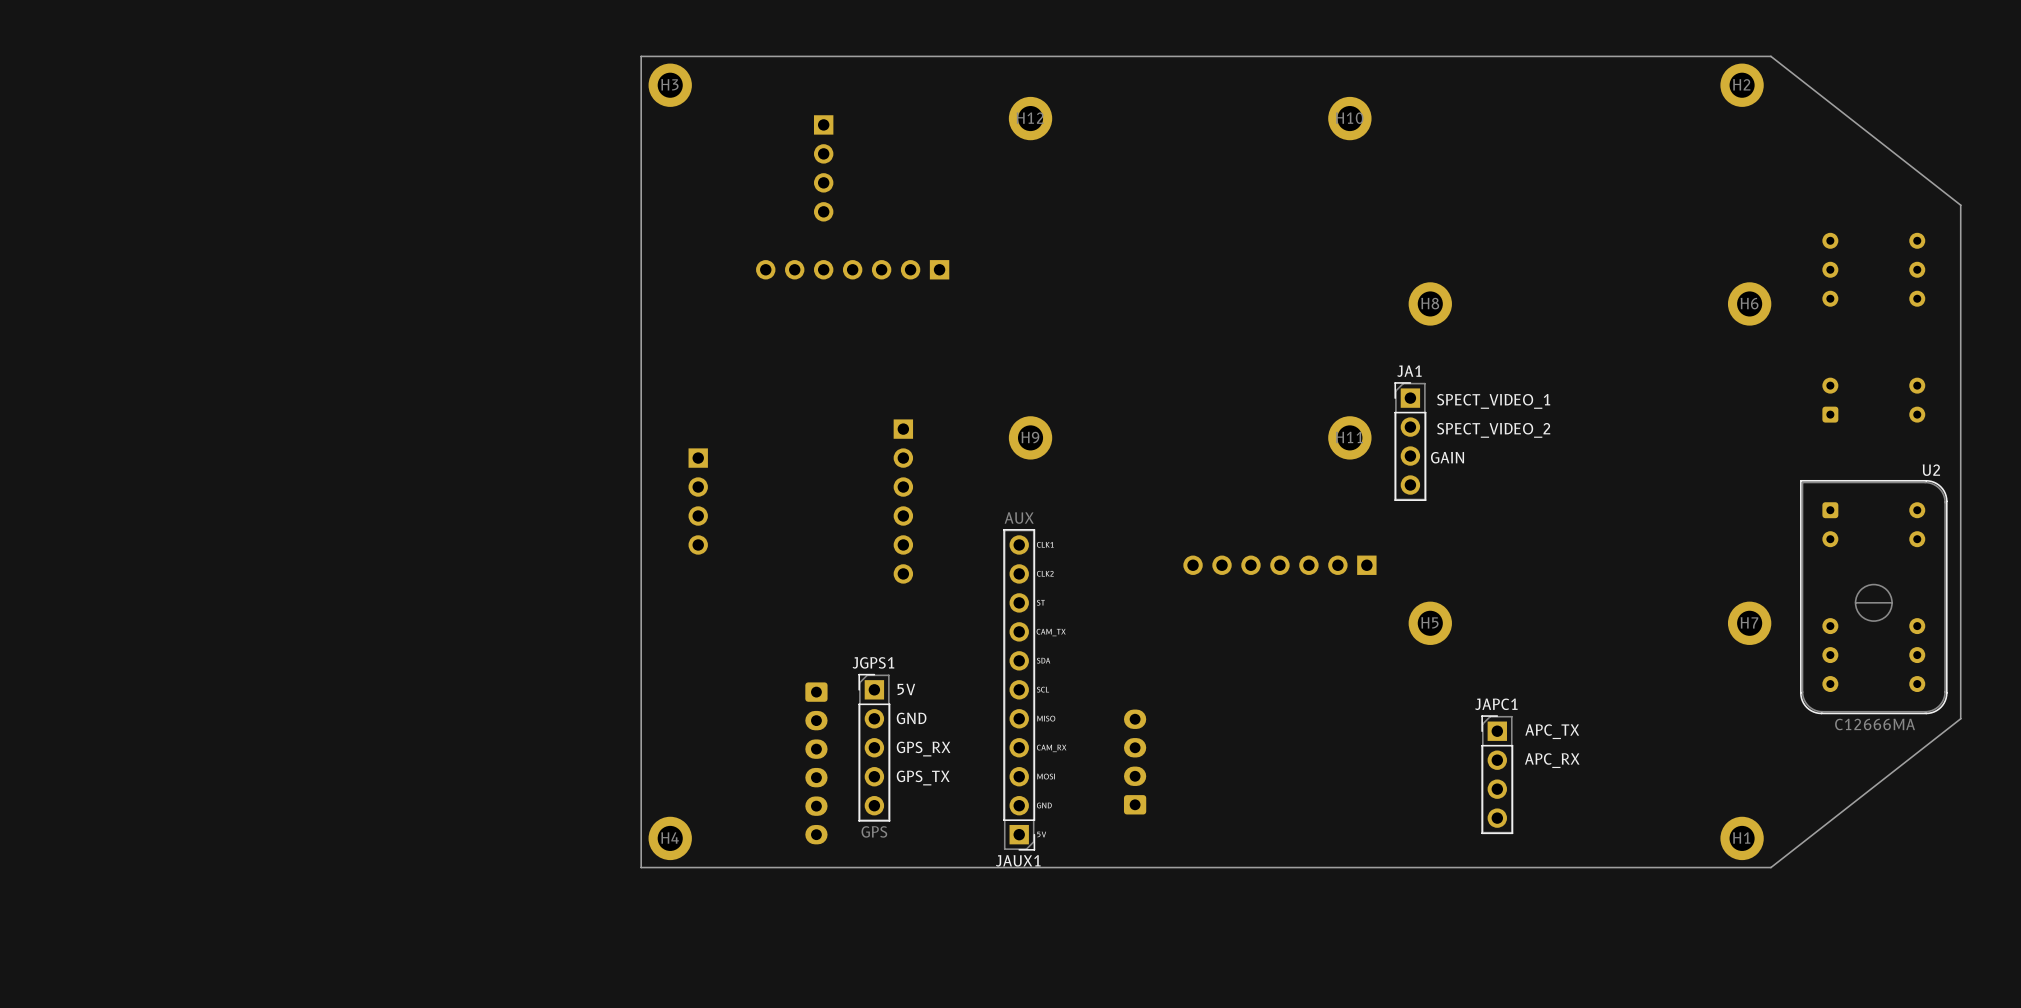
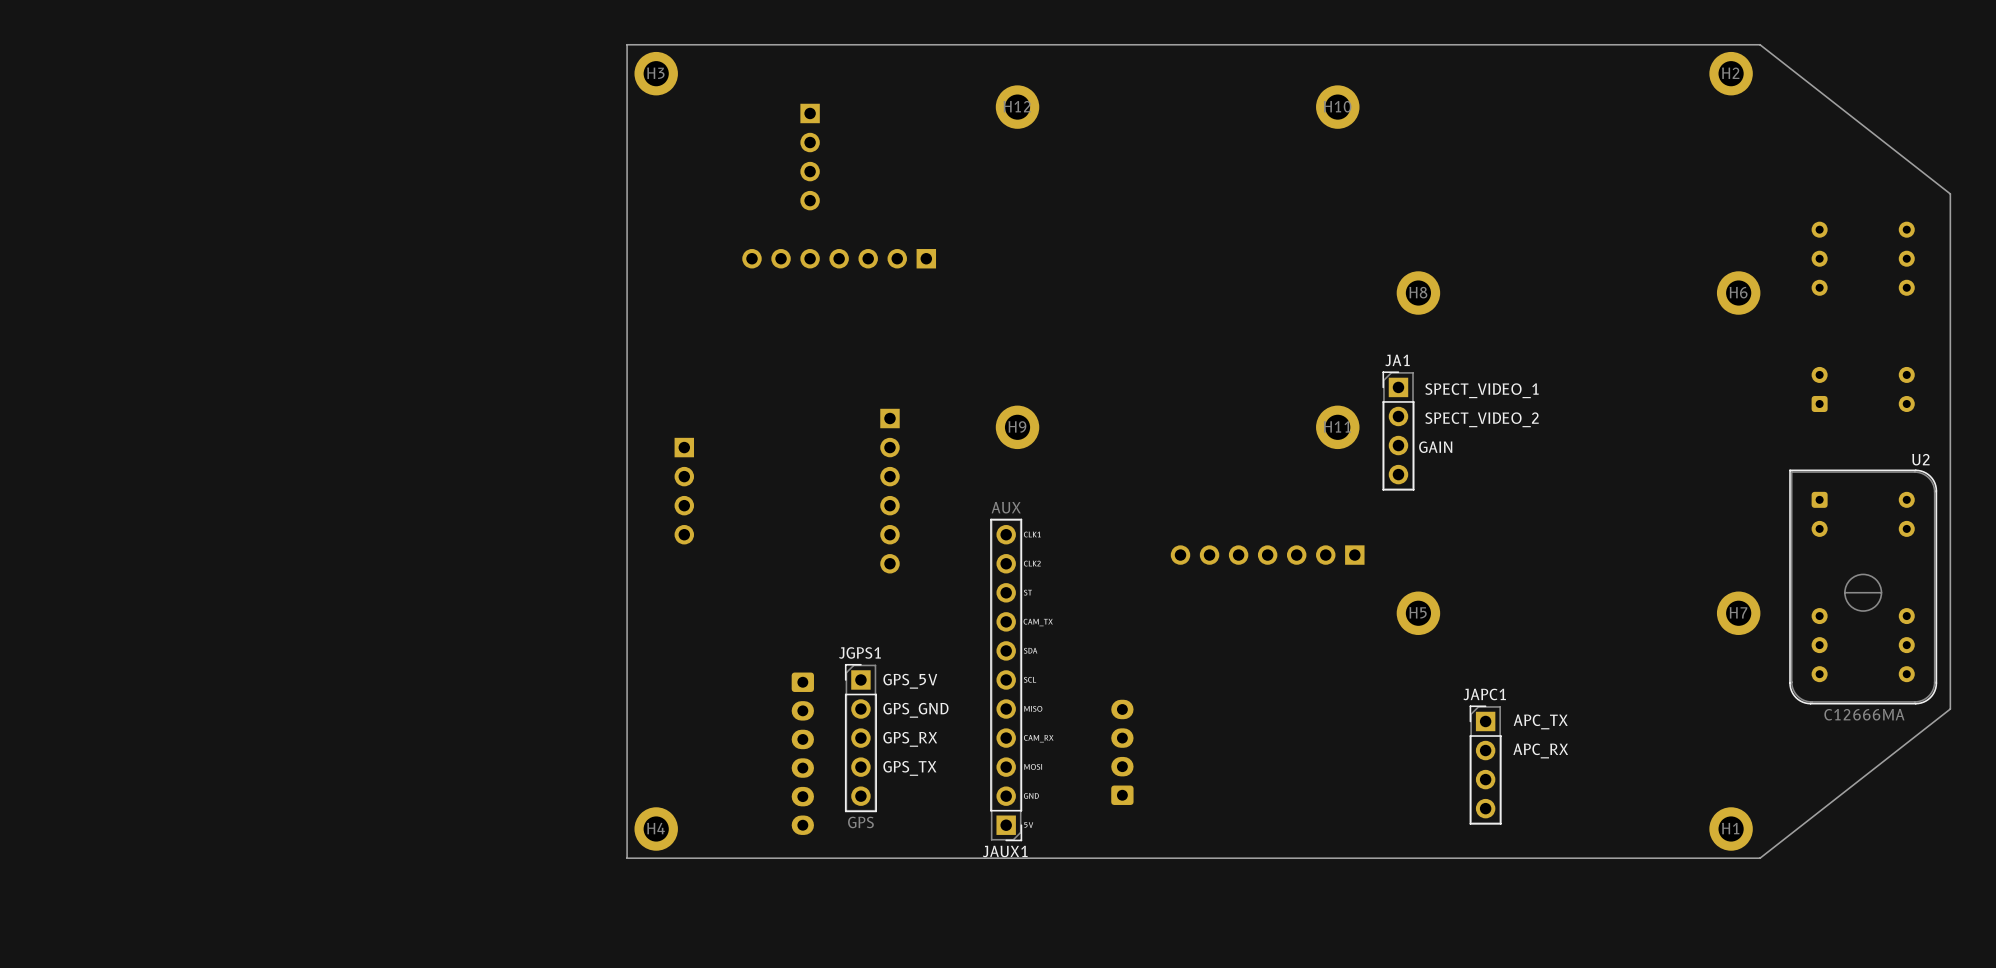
text: 5V (906, 689) -> GPS_5V (910, 681)
text: GND (911, 718) -> GPS_GND (915, 710)

